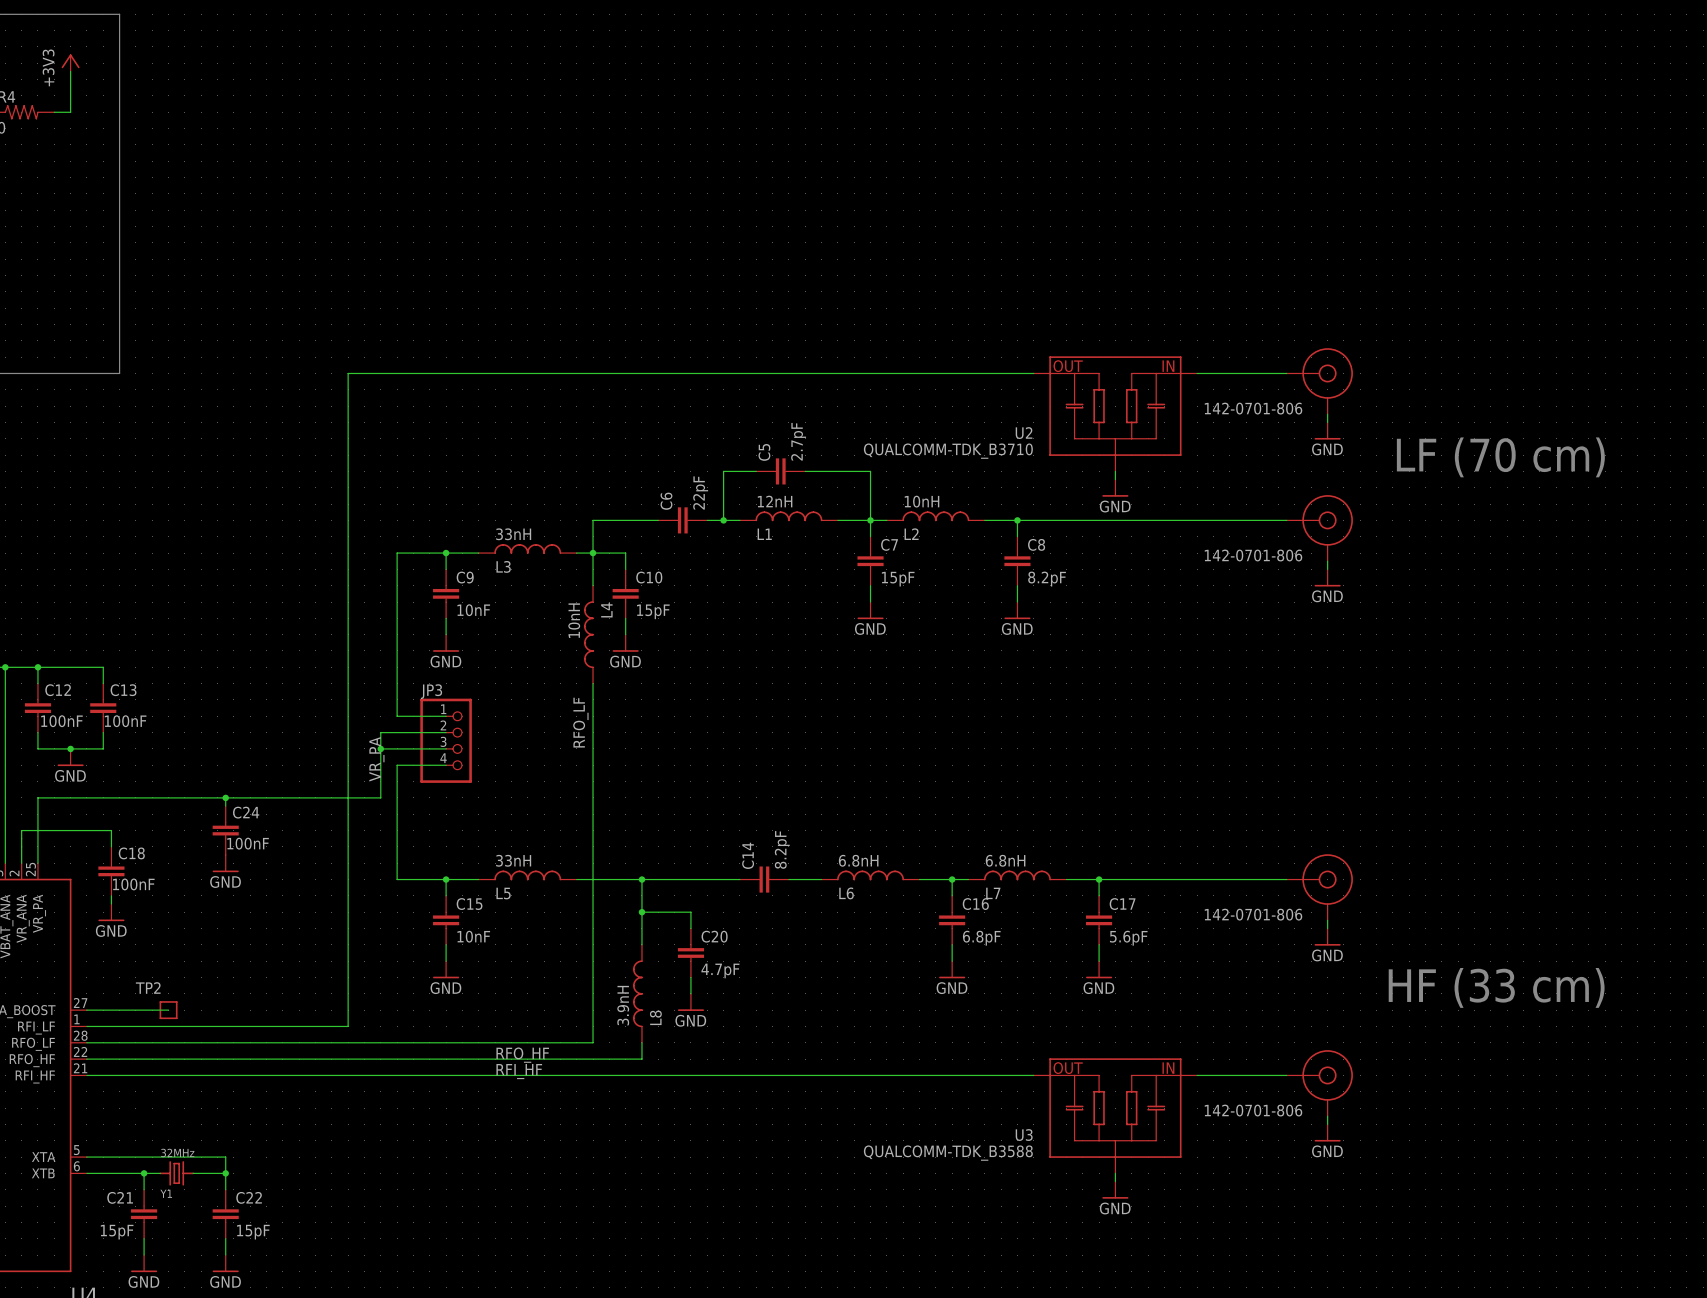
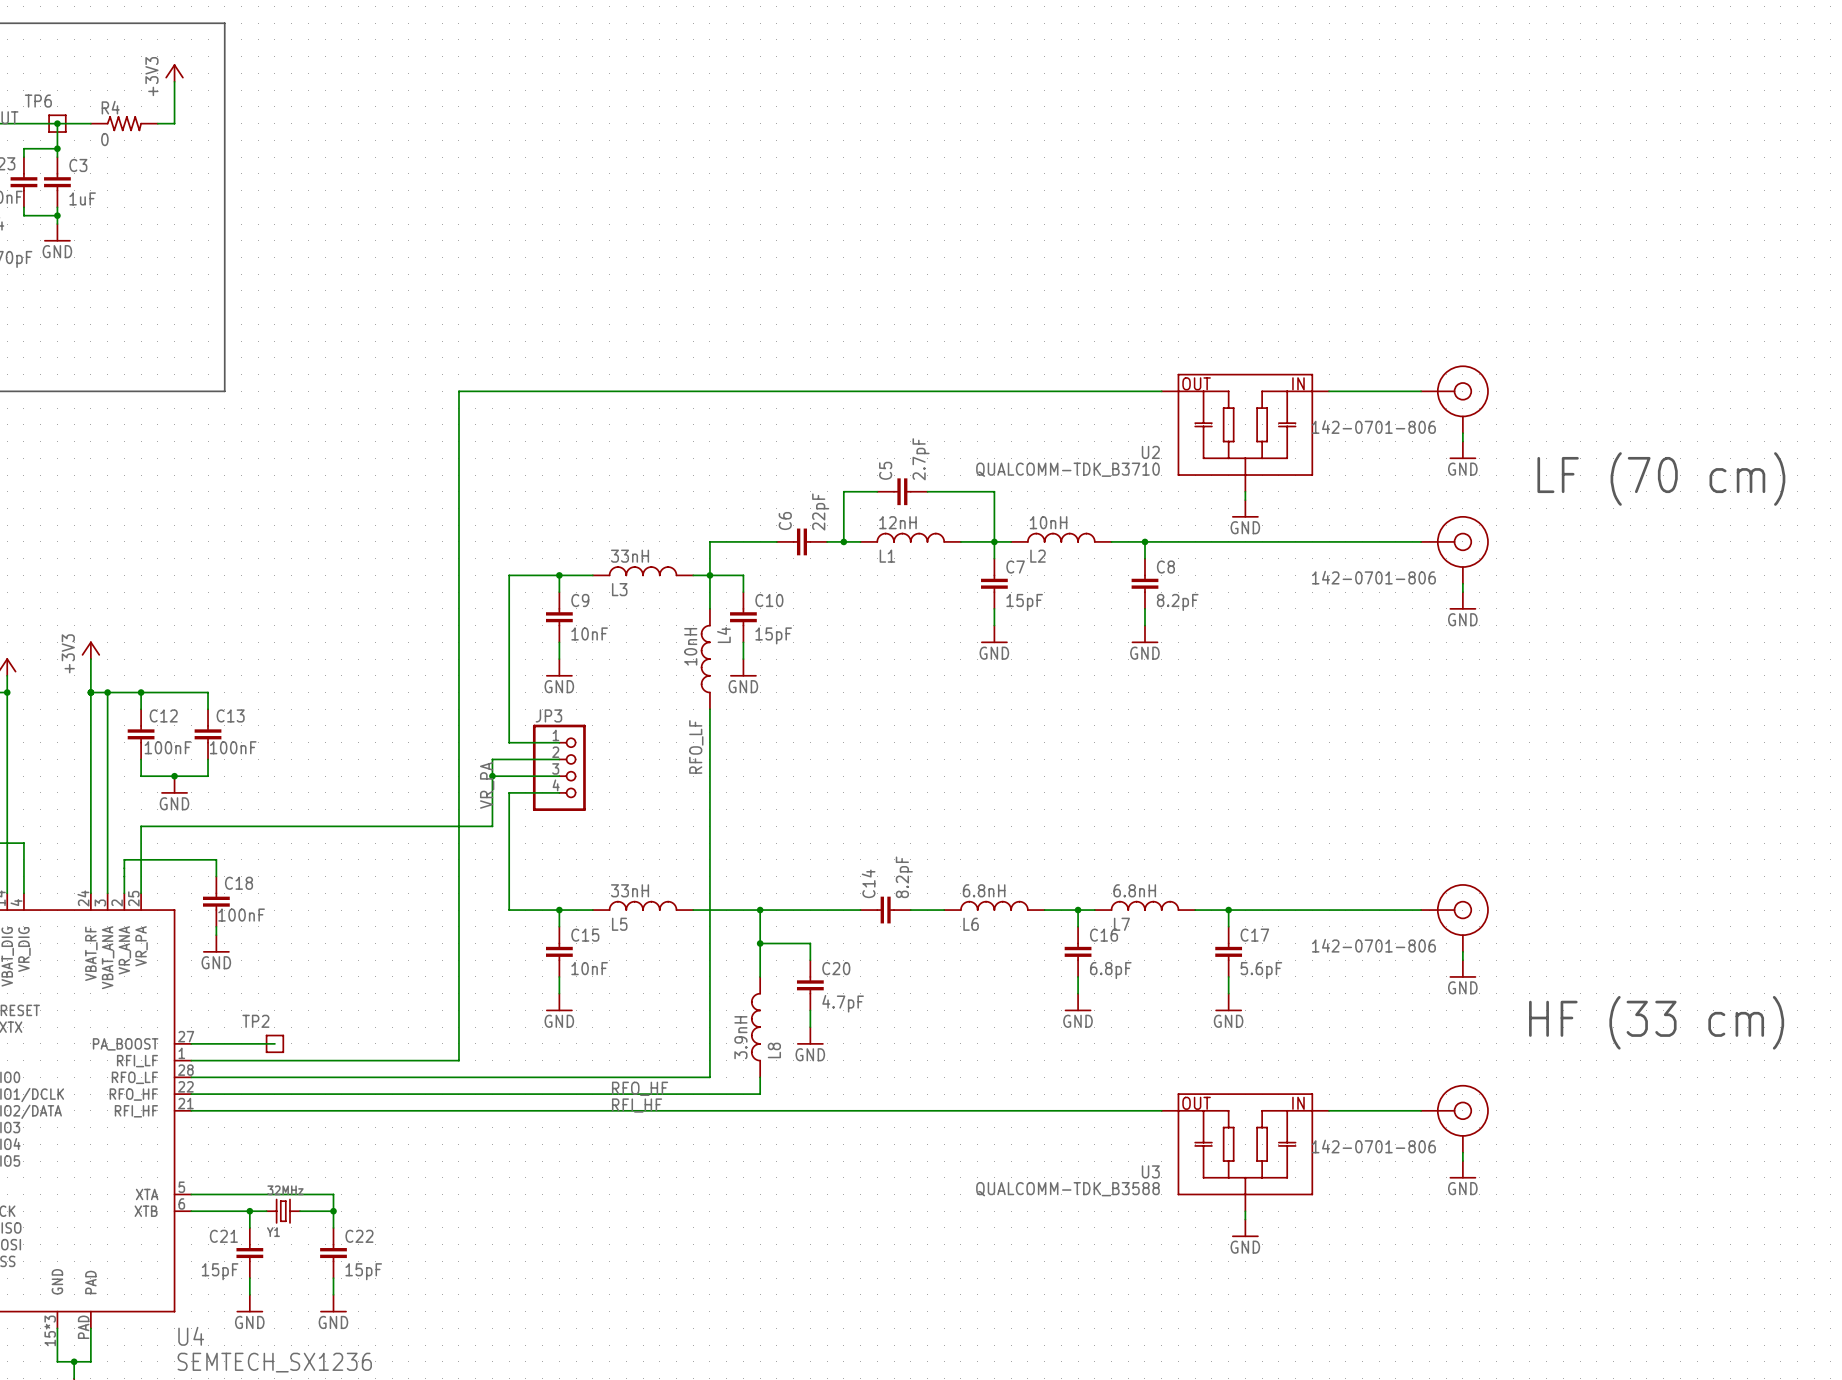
wire: (225, 797) (225, 806) -> none
junction: (225, 797) -> none
C24: 100nF (225, 830) -> none
power symbol: GND (225, 863) -> none

